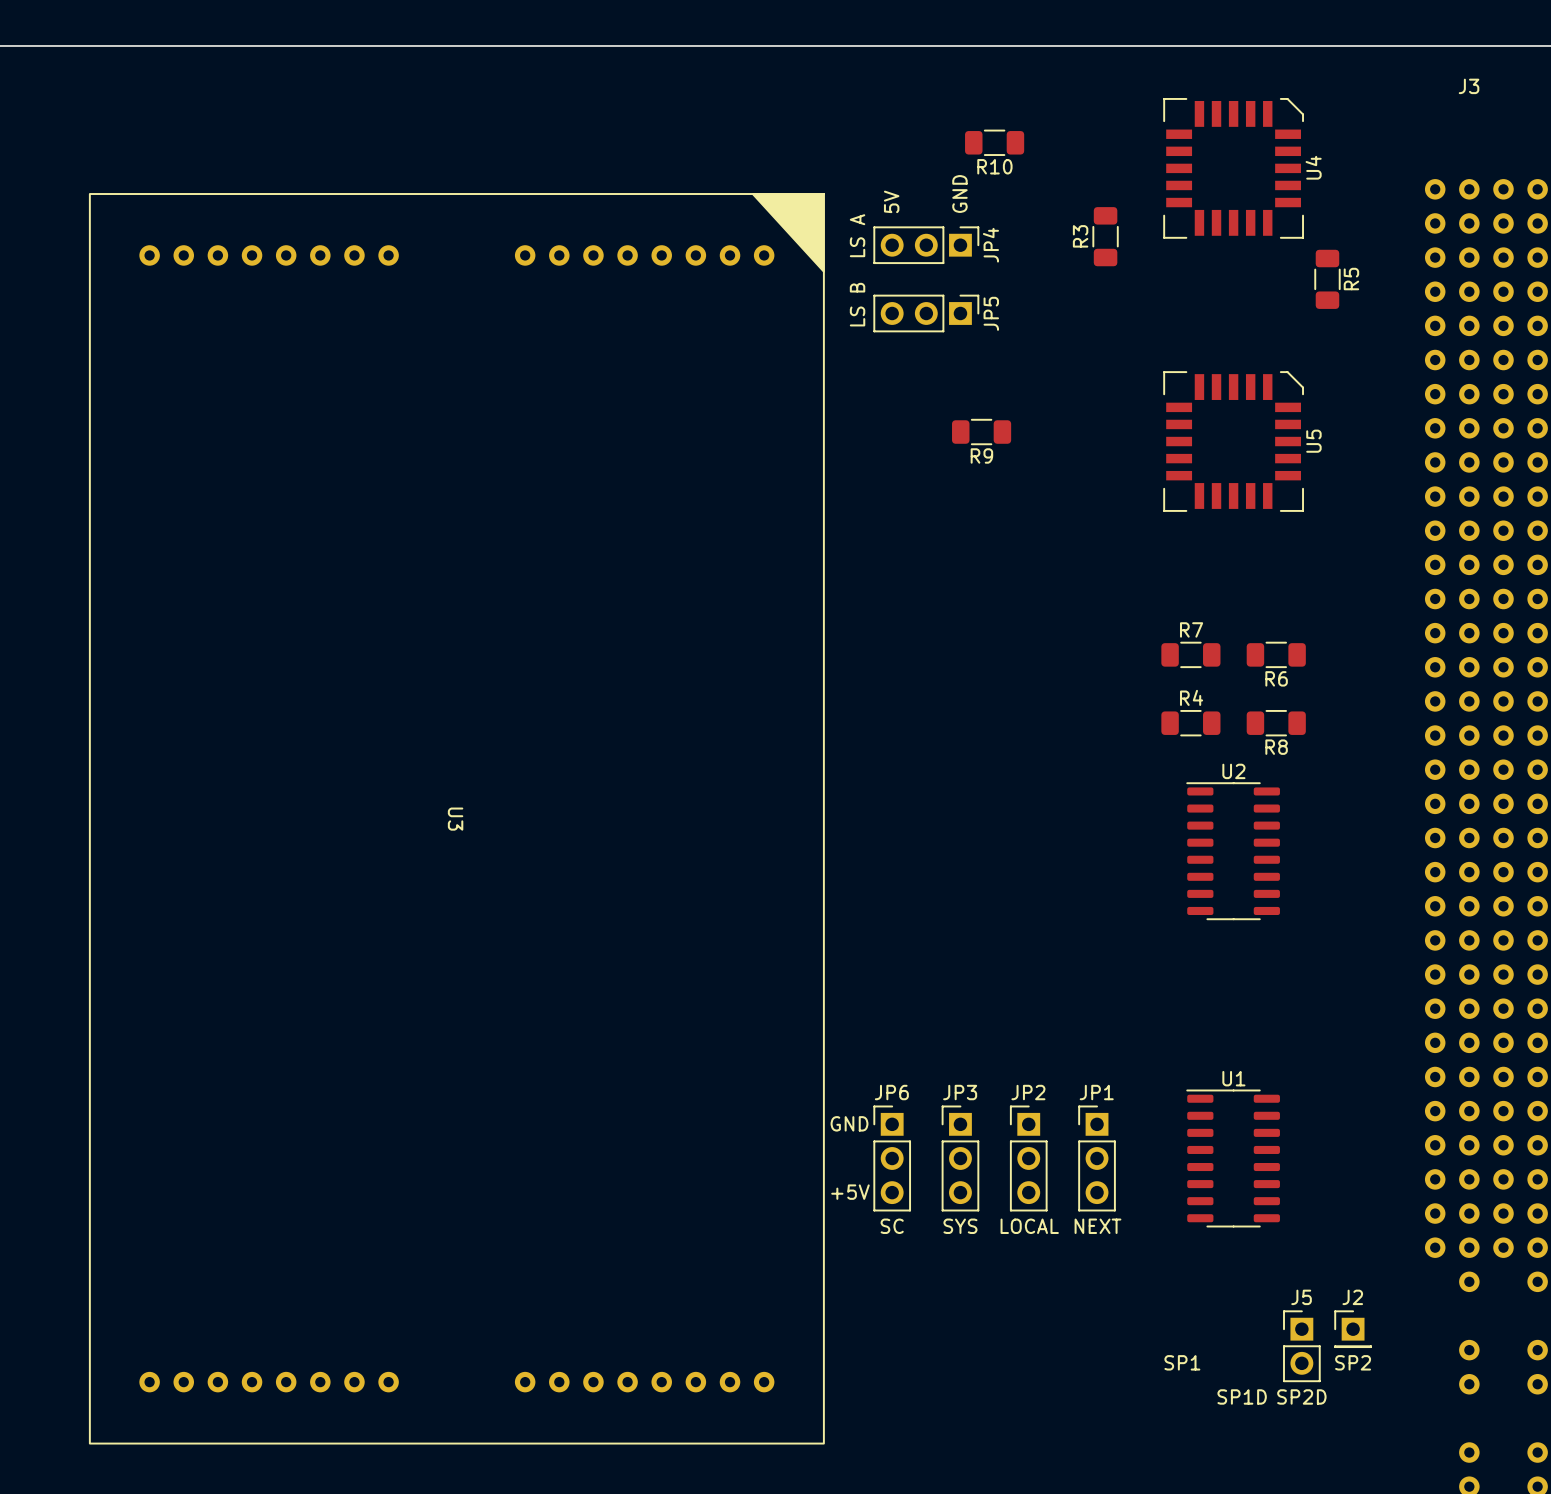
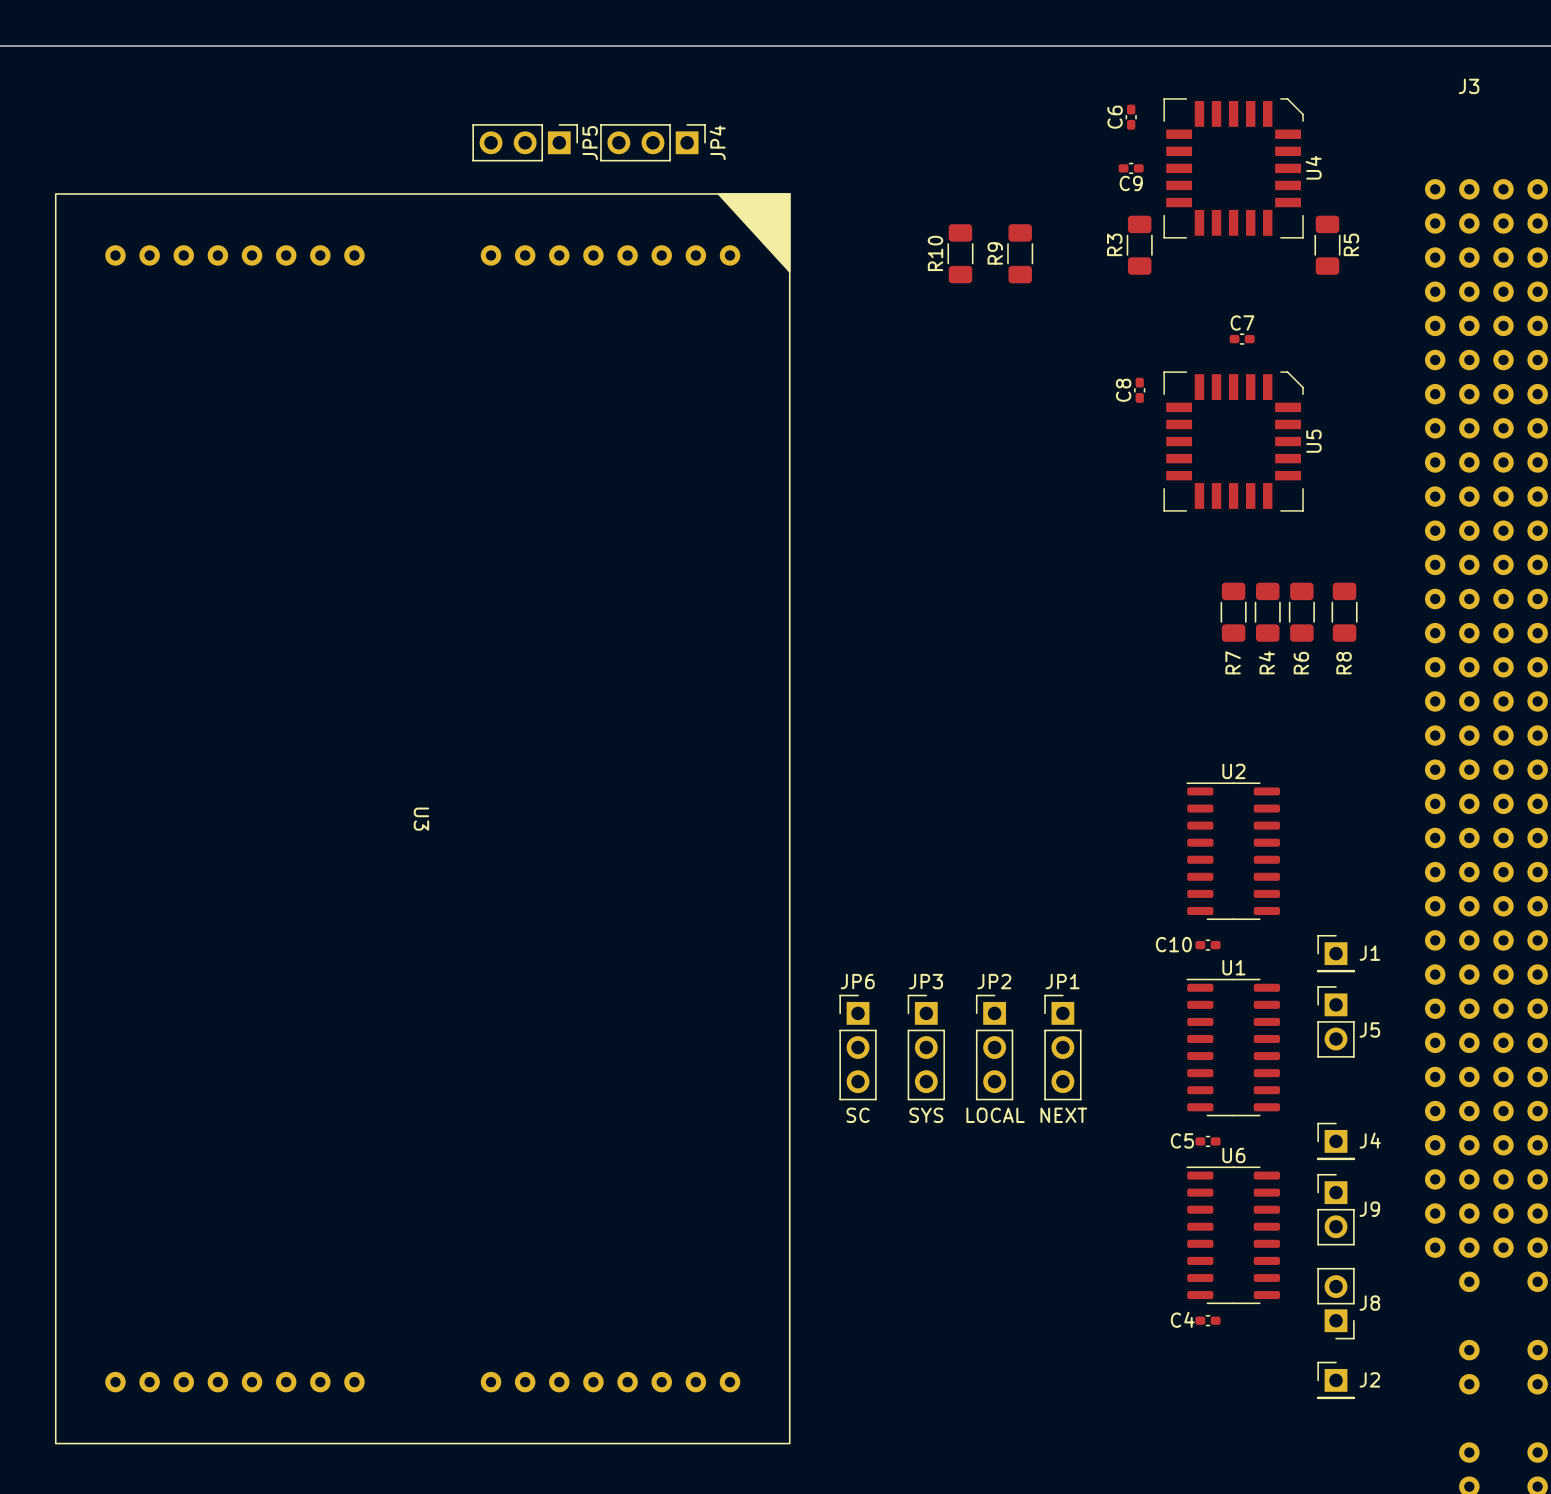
C6: none -> (1131, 117)
R10 rotation: 0° (994, 142) -> 90° clockwise (960, 253)
R10 position: (994, 142) -> (960, 253)
C9: none -> (1131, 168)
text: GND (959, 194) -> none
text: 5V (891, 201) -> none
text: LS A (857, 235) -> none
R3 position: (1105, 236) -> (1139, 245)
JP4 position: (926, 245) -> (652, 142)
R5 position: (1327, 279) -> (1327, 245)
text: LS B (857, 304) -> none
JP5 position: (926, 313) -> (525, 142)
C7: none -> (1242, 339)
C8: none -> (1139, 390)
R9 rotation: 0° (981, 432) -> 90° clockwise (1020, 253)
R9 position: (981, 432) -> (1020, 253)
R7 name position: R7 (1191, 629) -> R7 (1233, 662)
R7 rotation: 0° (1190, 654) -> 90° clockwise (1233, 612)
R7 position: (1190, 654) -> (1233, 612)
R6 rotation: 0° (1276, 654) -> 90° clockwise (1301, 612)
R6 position: (1276, 654) -> (1301, 612)
R4 name position: R4 (1191, 697) -> R4 (1266, 662)
R4 rotation: 0° (1190, 723) -> 90° clockwise (1267, 612)
R4 position: (1190, 723) -> (1267, 612)
R8 rotation: 0° (1276, 723) -> 90° clockwise (1344, 612)
R8 position: (1276, 723) -> (1344, 612)
U3 position: (456, 818) -> (422, 818)
C10: none -> (1207, 945)
J1: none -> (1336, 953)
text: GND (849, 1123) -> none
C5: none -> (1207, 1141)
J4: none -> (1336, 1141)
JP6 position: (892, 1158) -> (858, 1047)
JP3 position: (960, 1158) -> (926, 1047)
JP2 position: (1028, 1158) -> (994, 1047)
JP1 position: (1097, 1158) -> (1062, 1047)
U1 position: (1233, 1158) -> (1233, 1047)
text: +5V (850, 1192) -> none
J9: none -> (1336, 1209)
text position: SC (892, 1226) -> SC (858, 1115)
text position: SYS (960, 1226) -> SYS (926, 1115)
text position: LOCAL (1029, 1226) -> LOCAL (995, 1115)
text position: NEXT (1097, 1226) -> NEXT (1063, 1115)
U6: none -> (1233, 1235)
J5 name position: J5 (1301, 1297) -> J5 (1369, 1029)
J2 name position: J2 (1352, 1297) -> J2 (1369, 1379)
J8: none -> (1336, 1303)
C4: none -> (1207, 1320)
J2 position: (1353, 1329) -> (1336, 1380)
J5 position: (1301, 1346) -> (1336, 1021)
text: SP1 (1182, 1362) -> none
text: SP2 (1353, 1362) -> none
text: SP1D (1242, 1396) -> none
text: SP2D (1301, 1396) -> none

